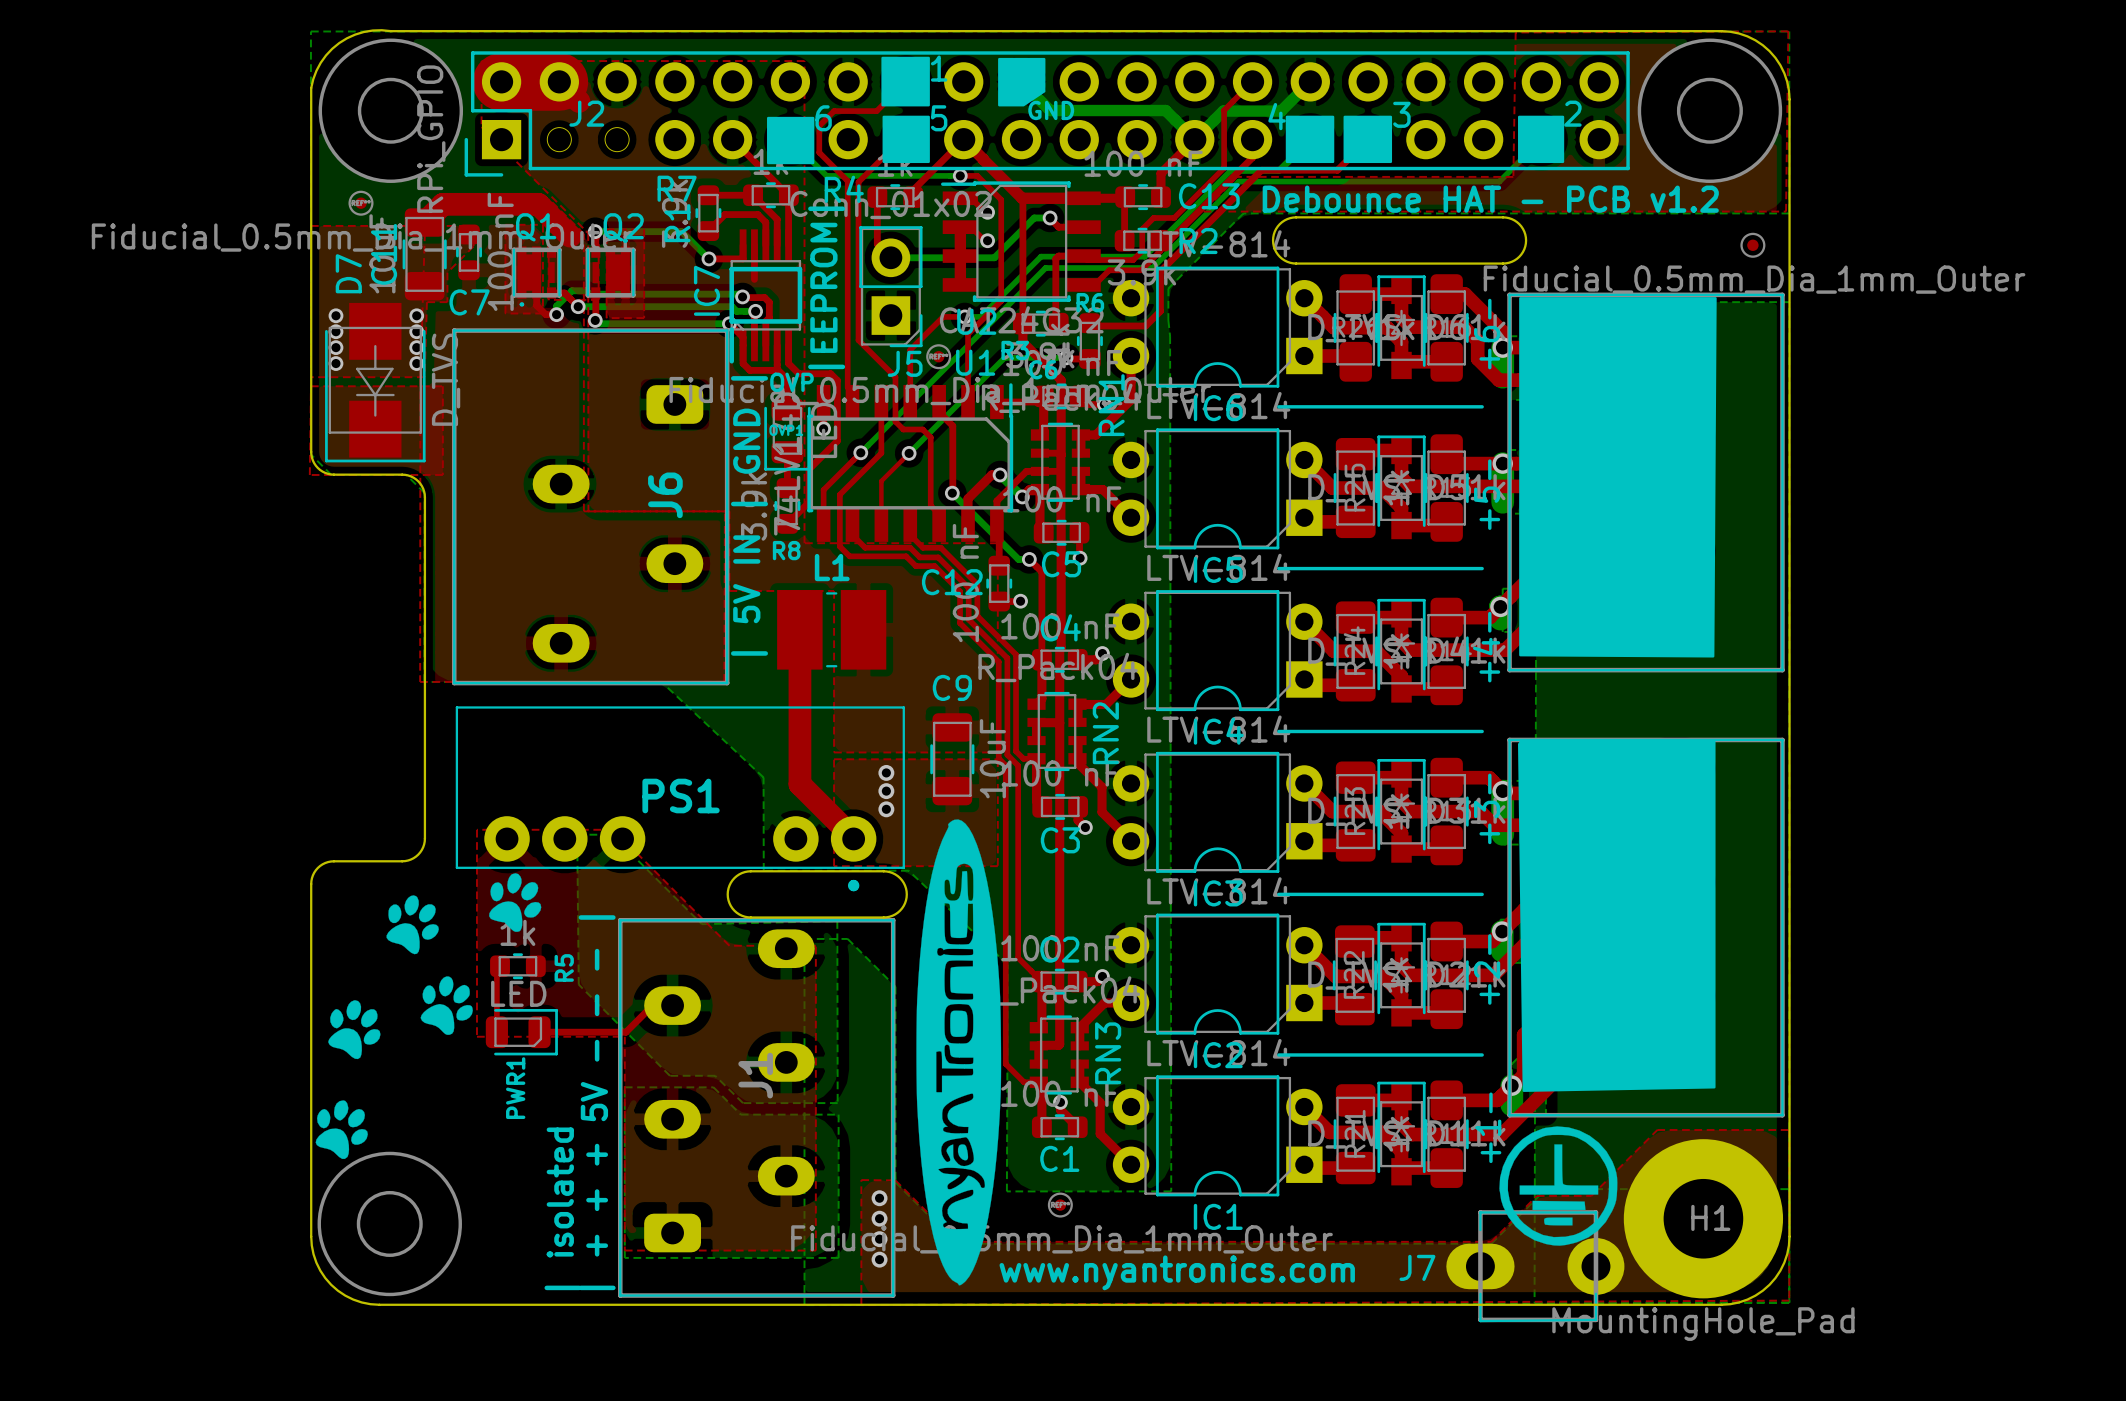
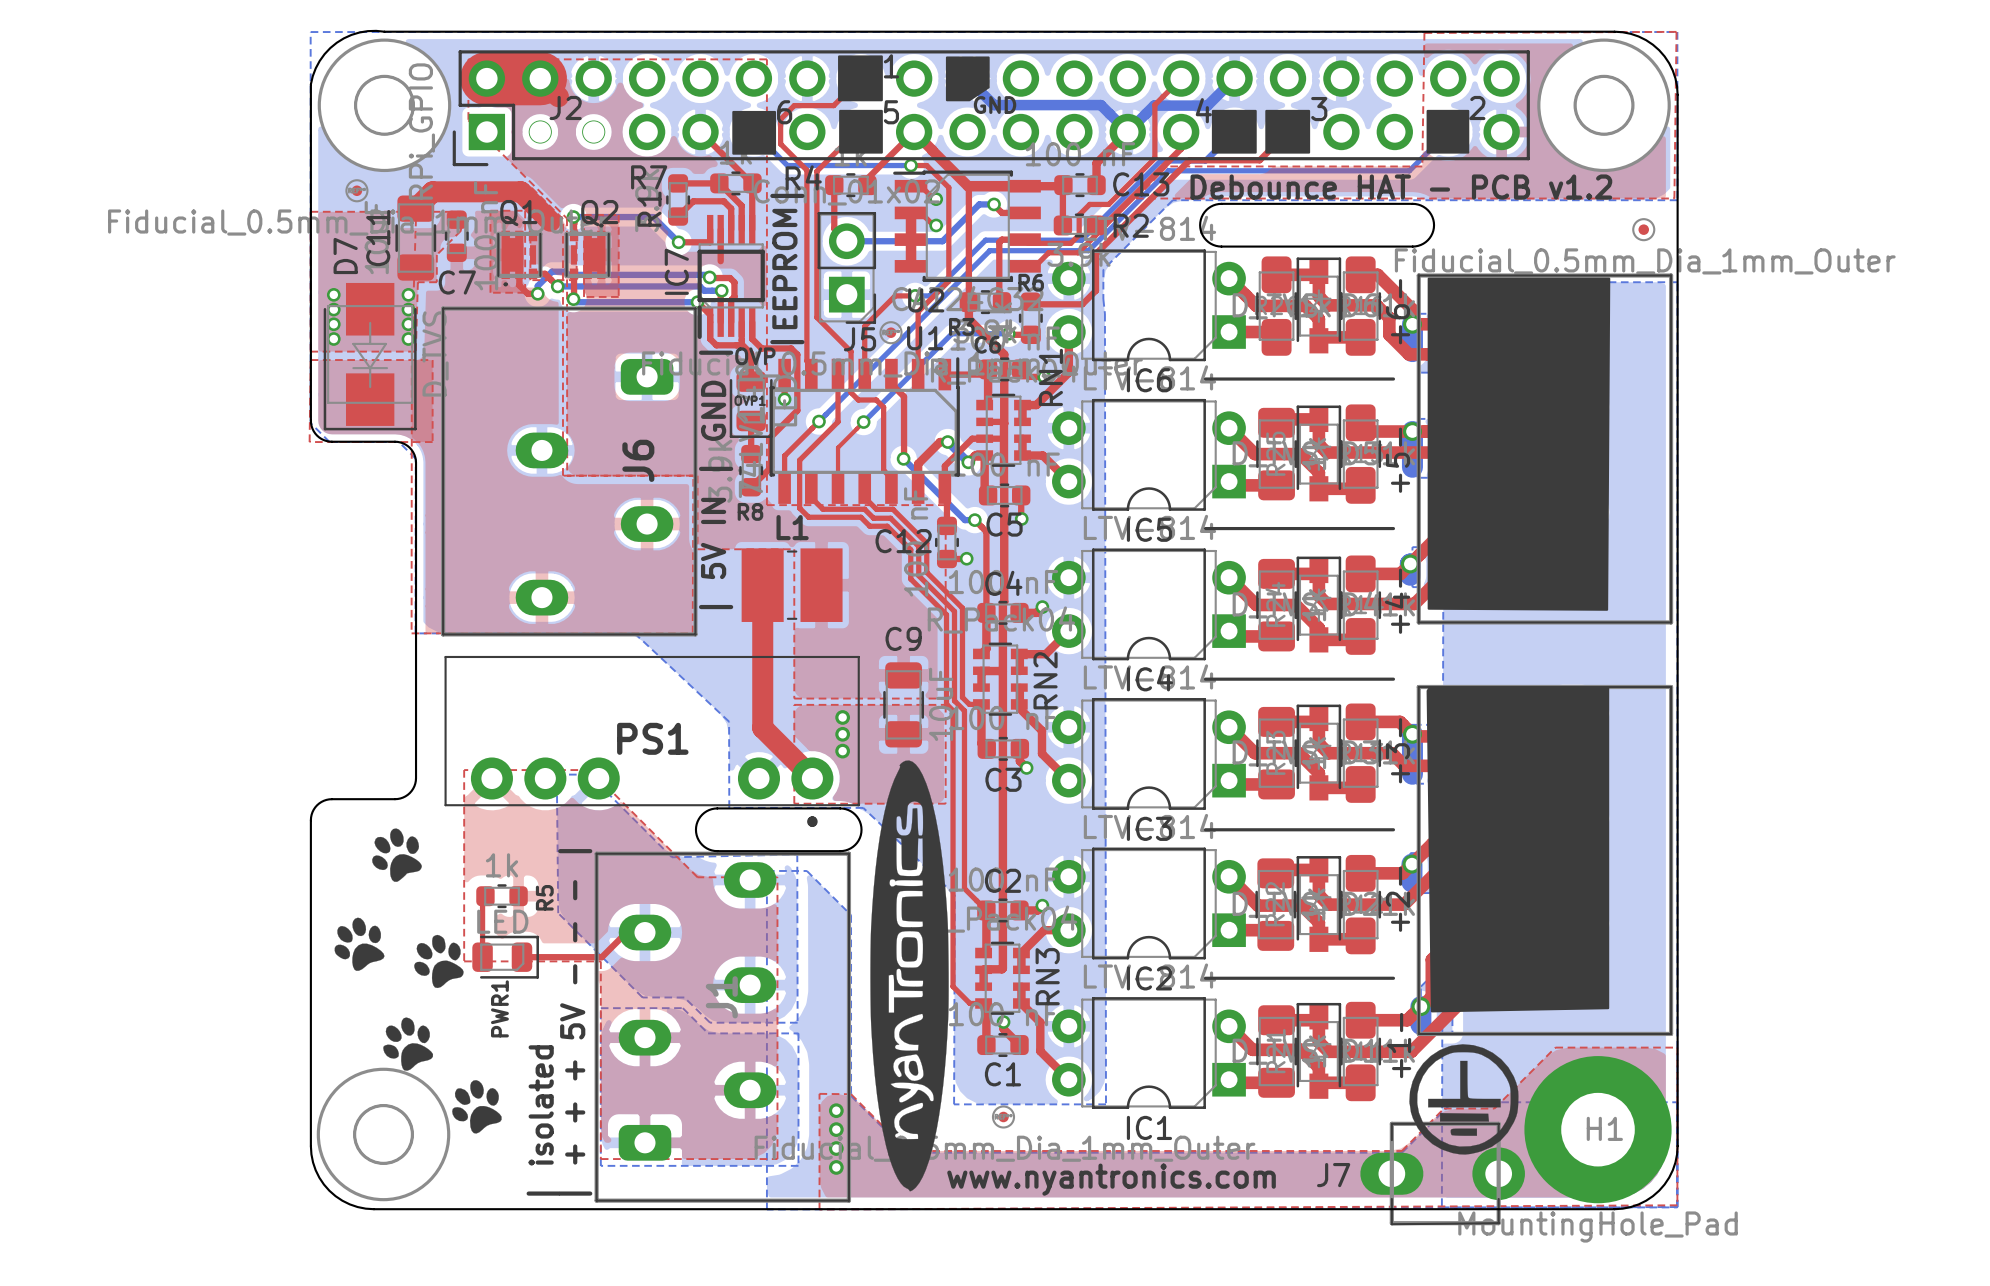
drawing: [315, 873, 542, 1159] -> none
drawing: none -> [334, 828, 502, 1134]

